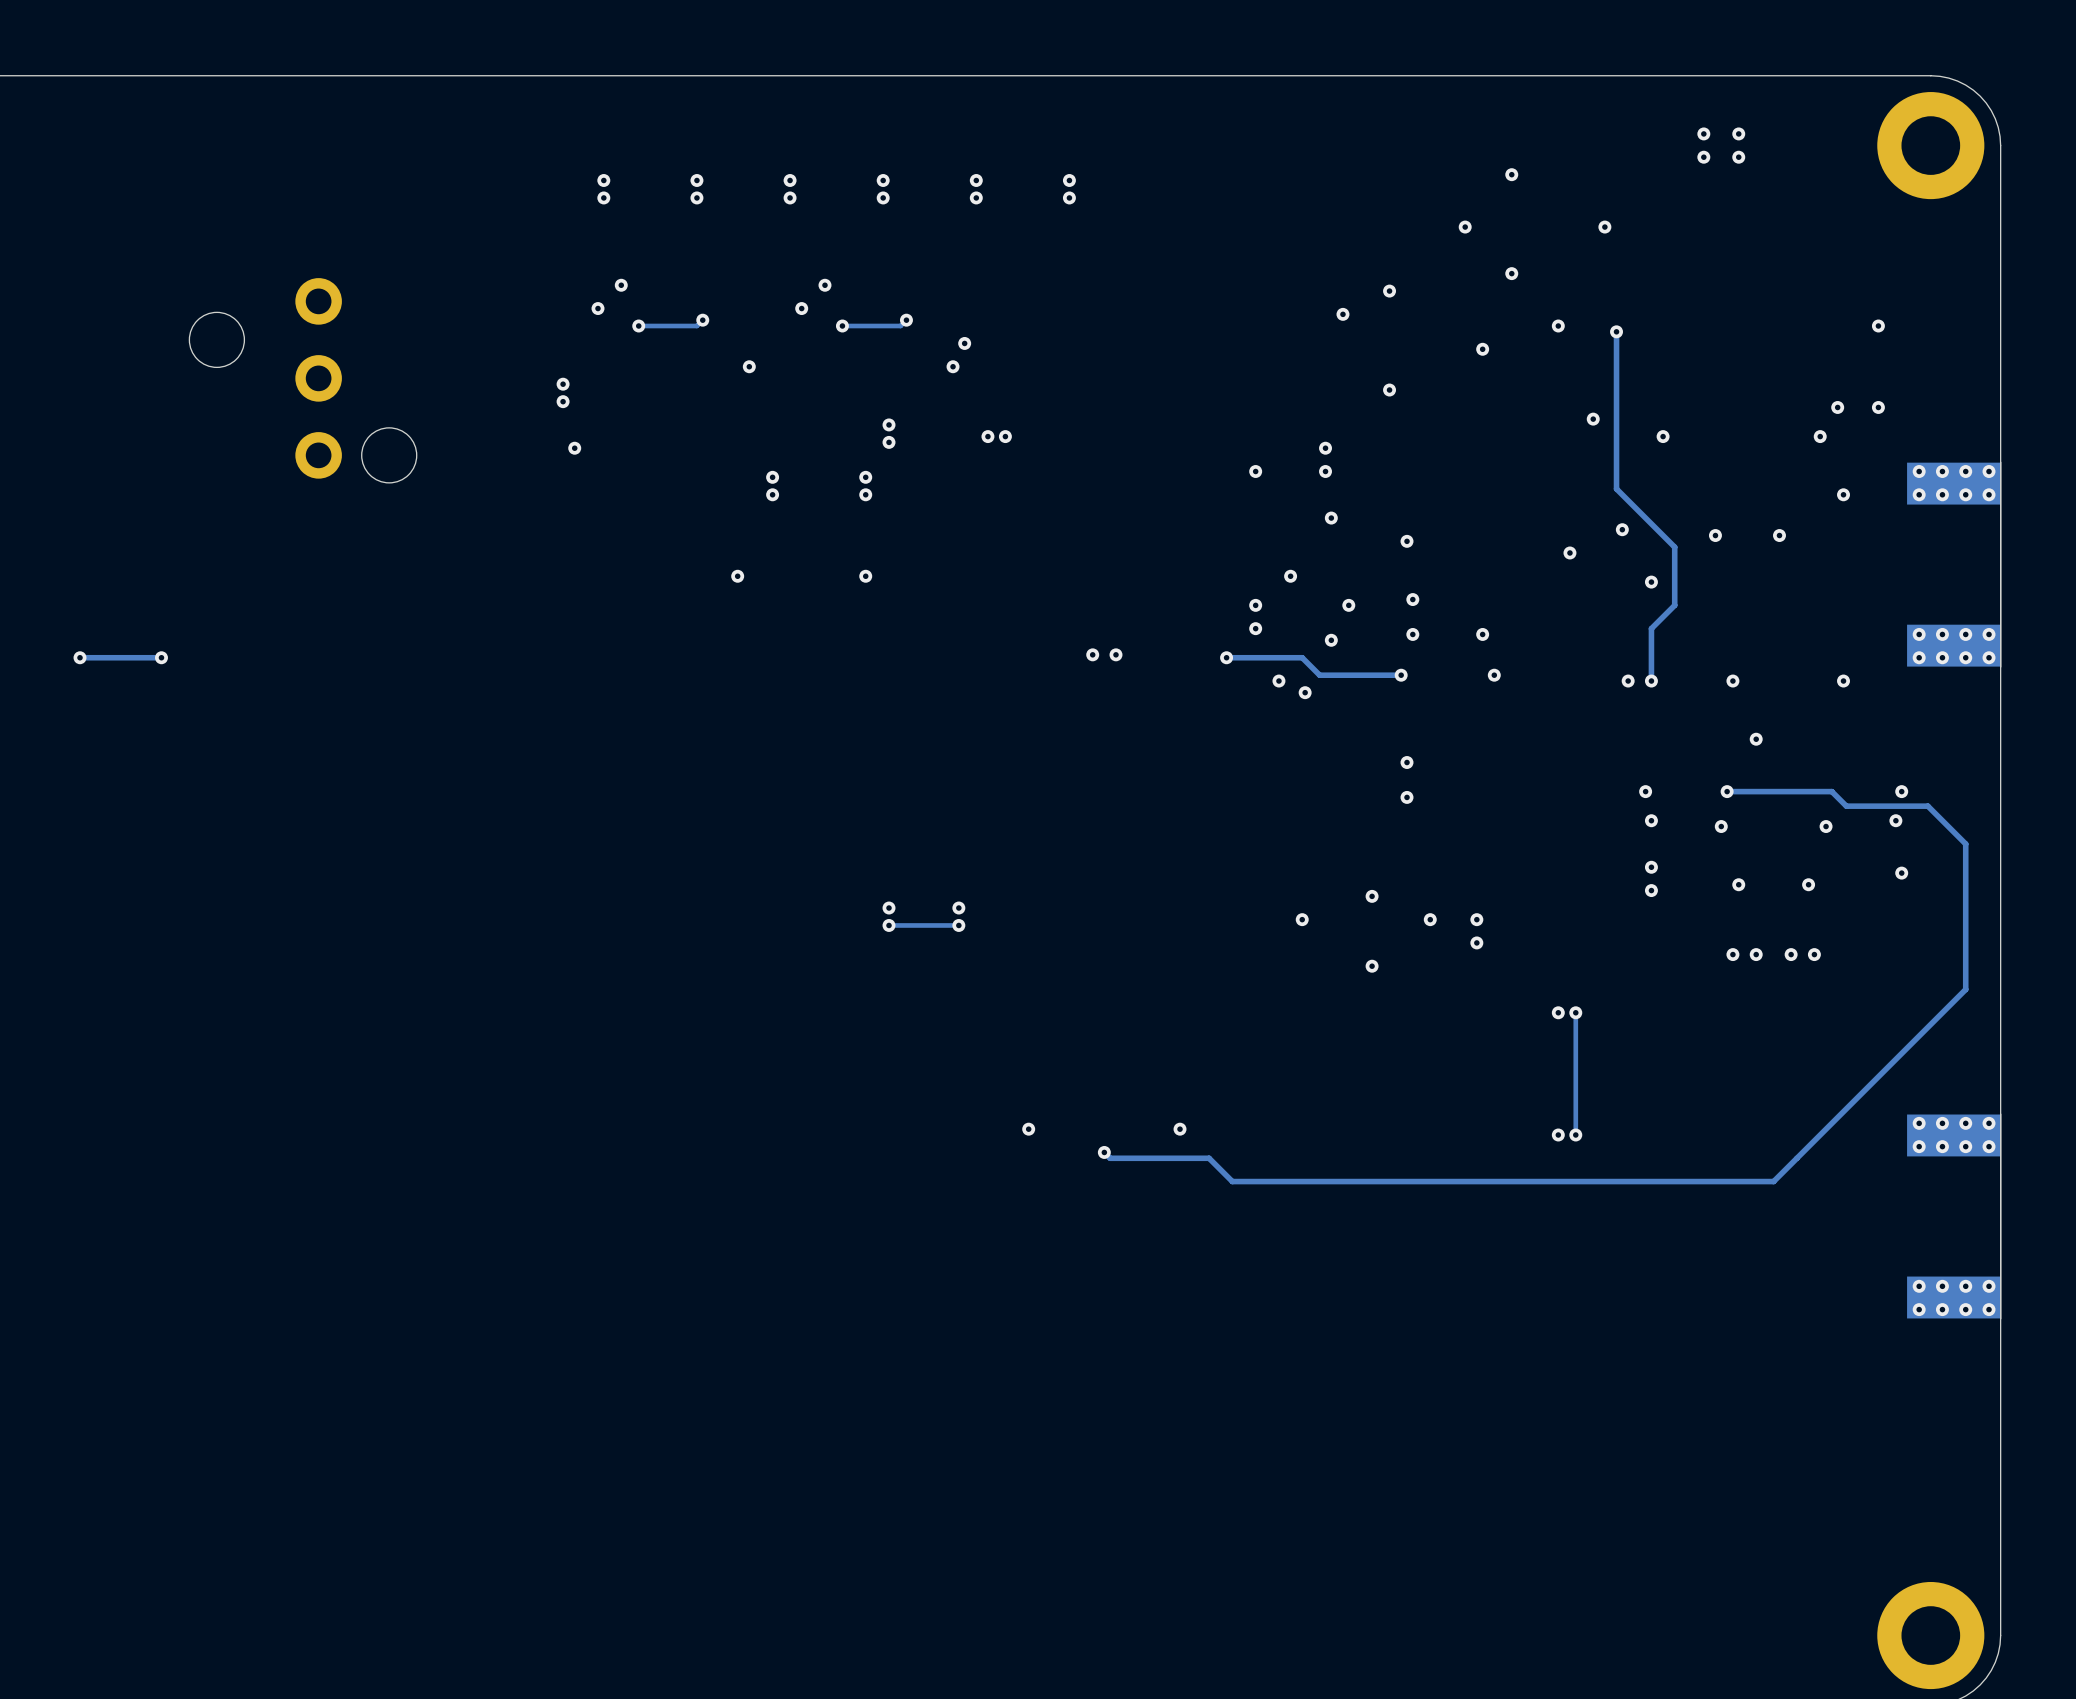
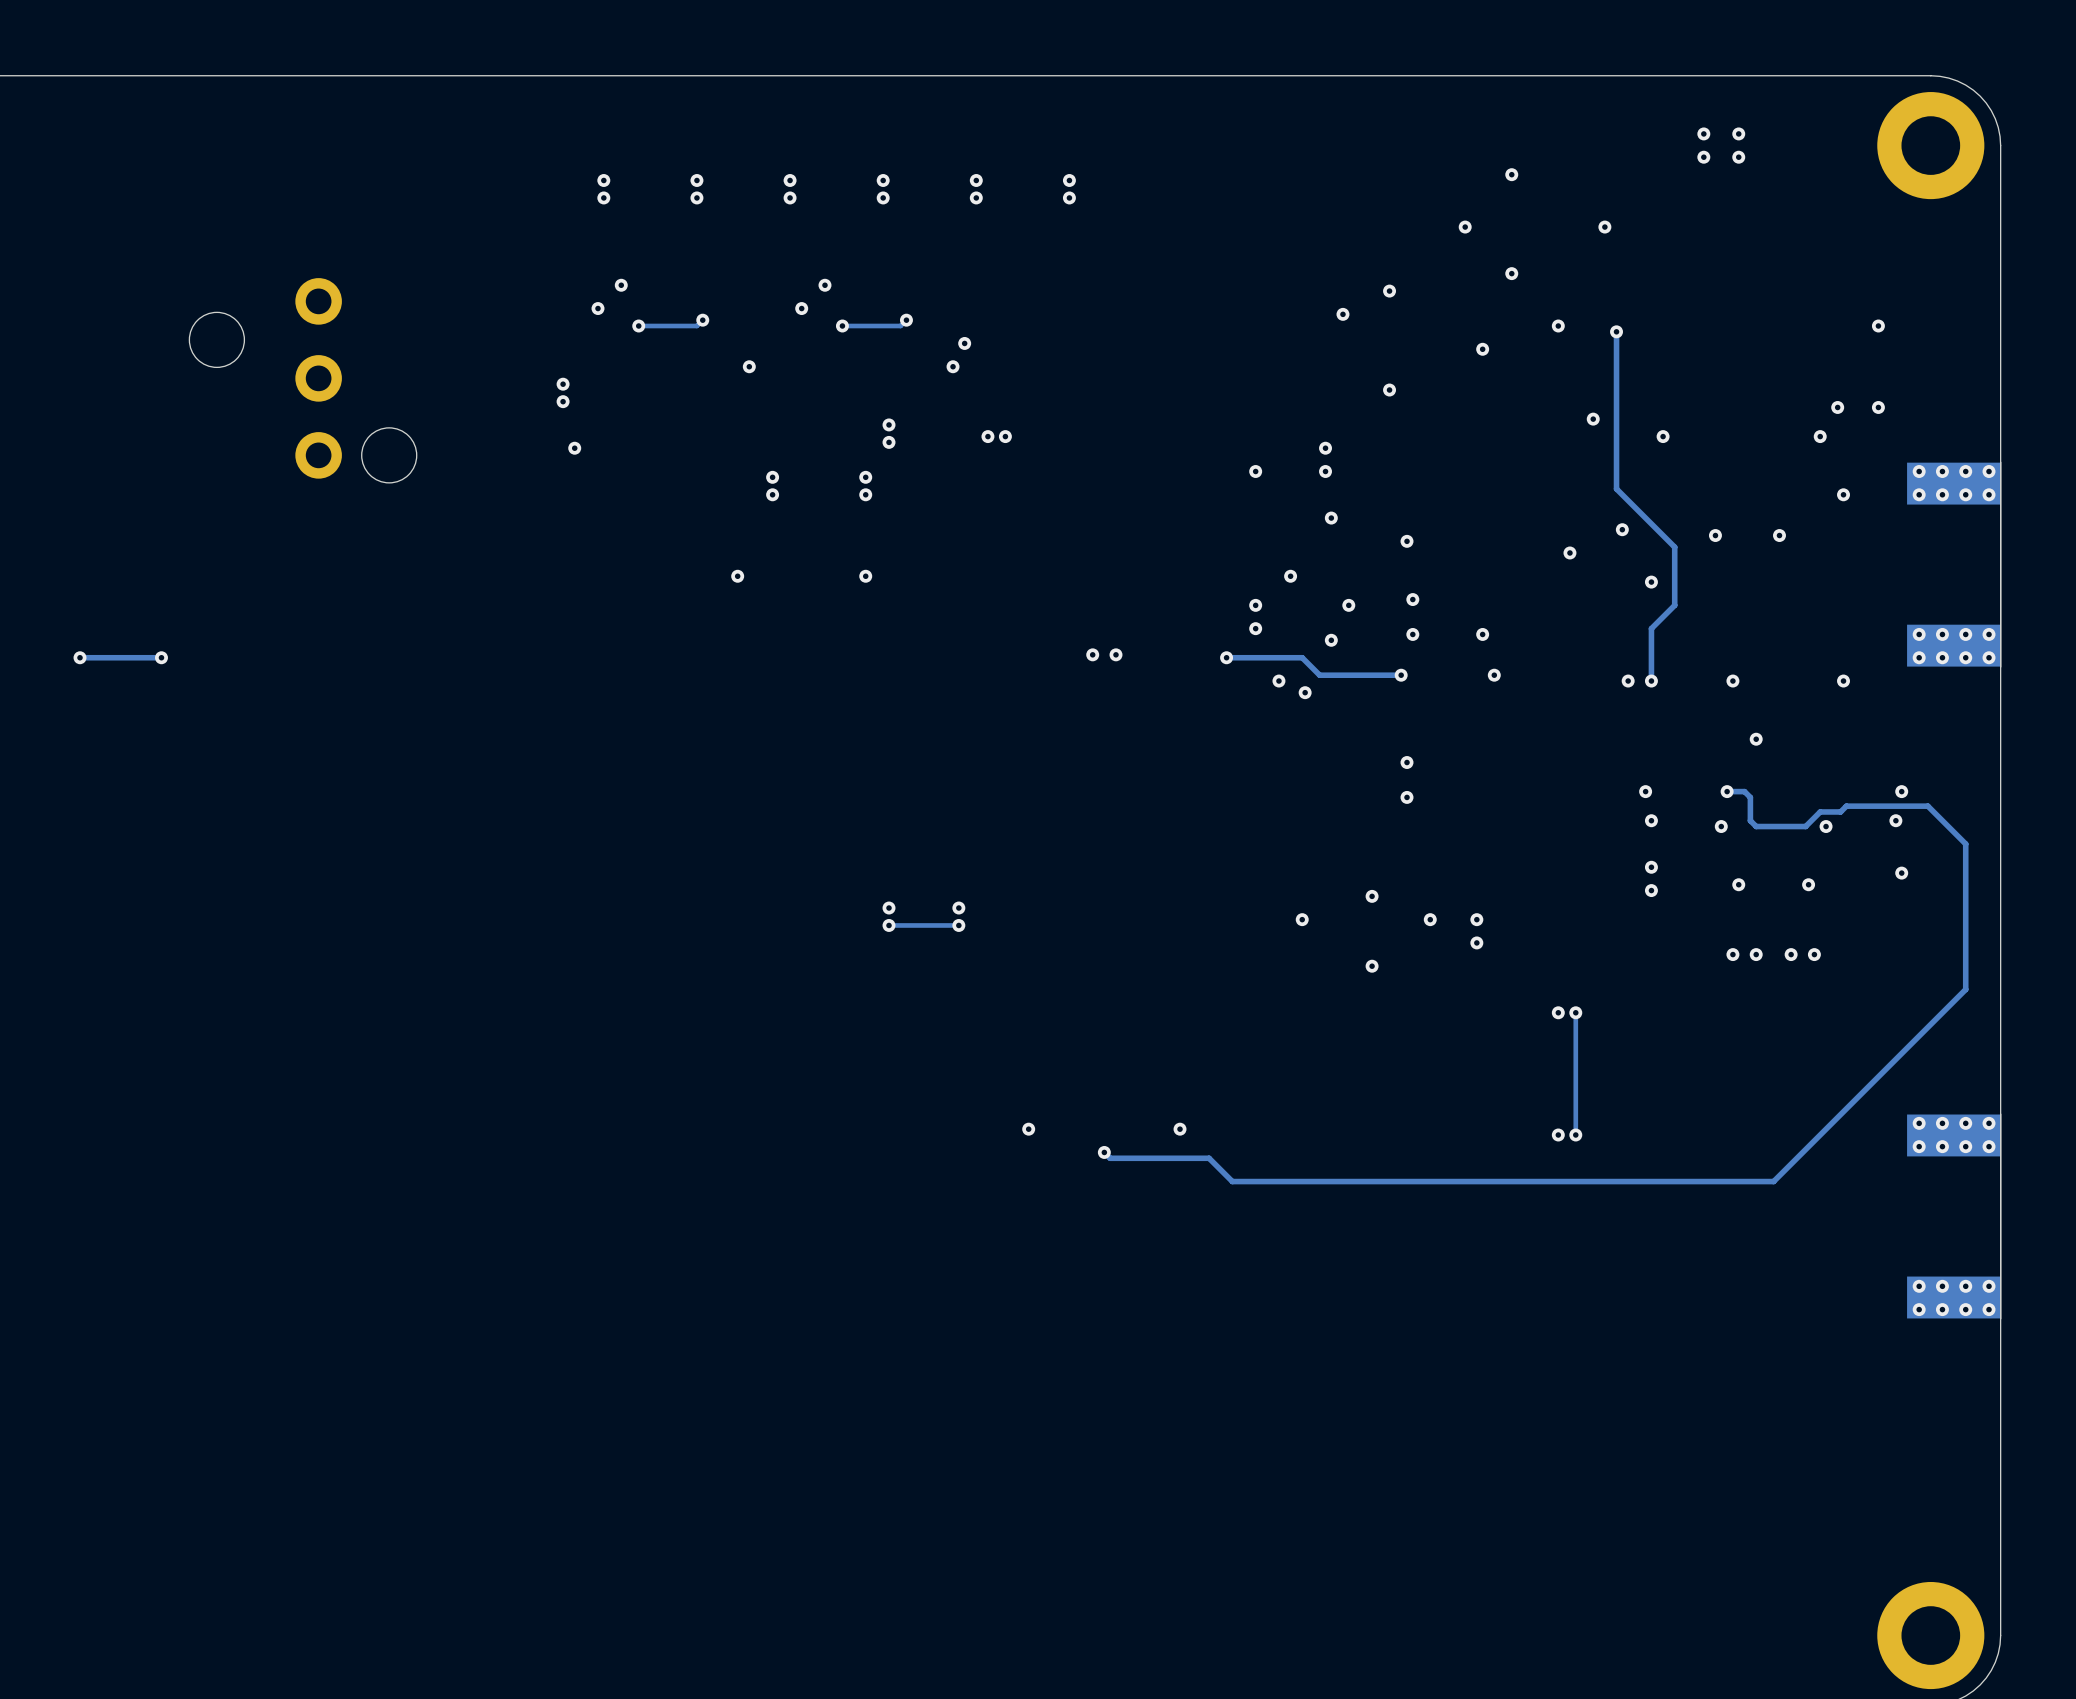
track: (1744, 791) (1831, 791) (1846, 806) -> (1744, 791) (1750, 797) (1750, 820) (1756, 826) (1805, 826) (1820, 811) (1840, 811) (1846, 806)

